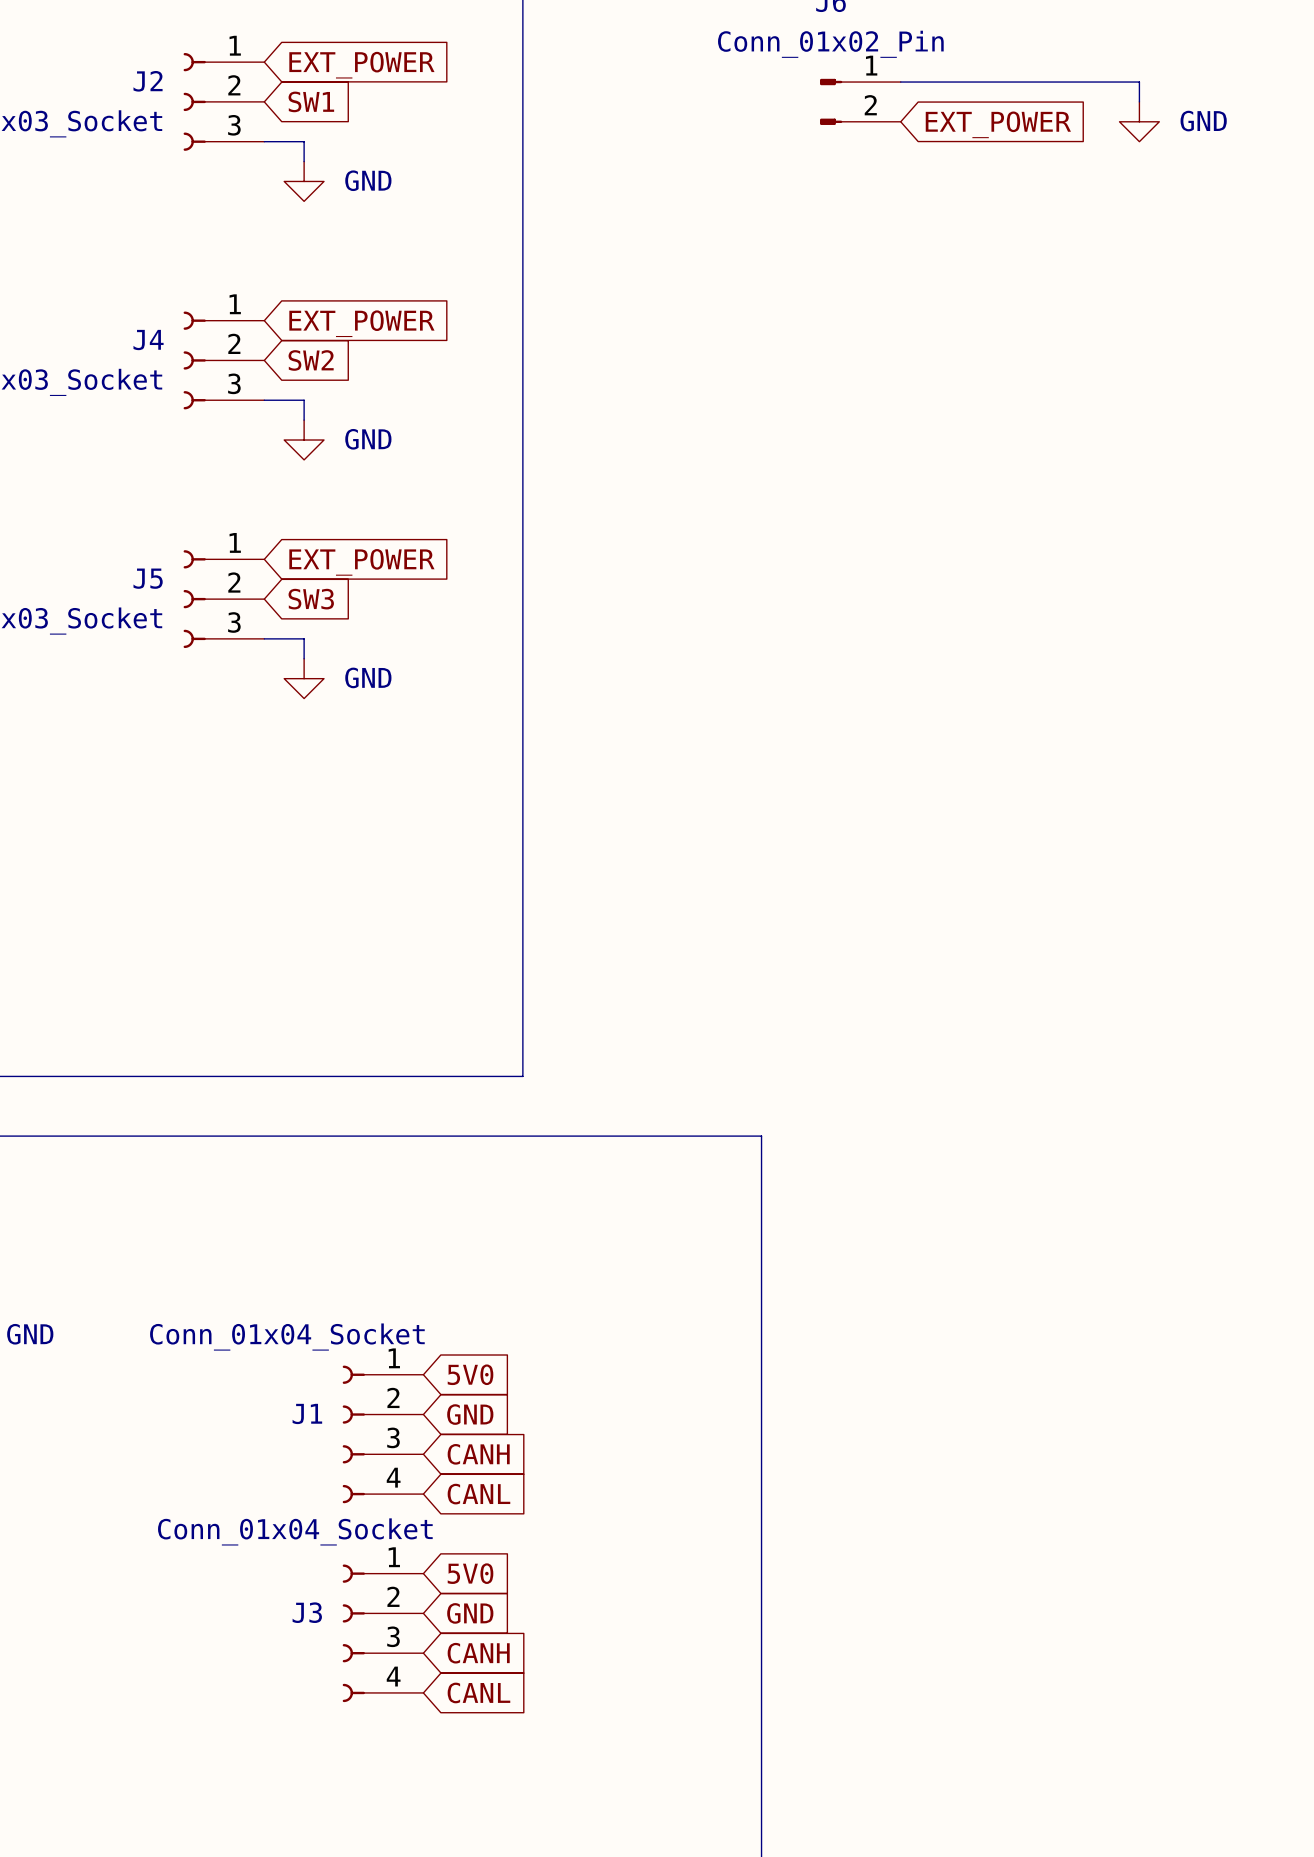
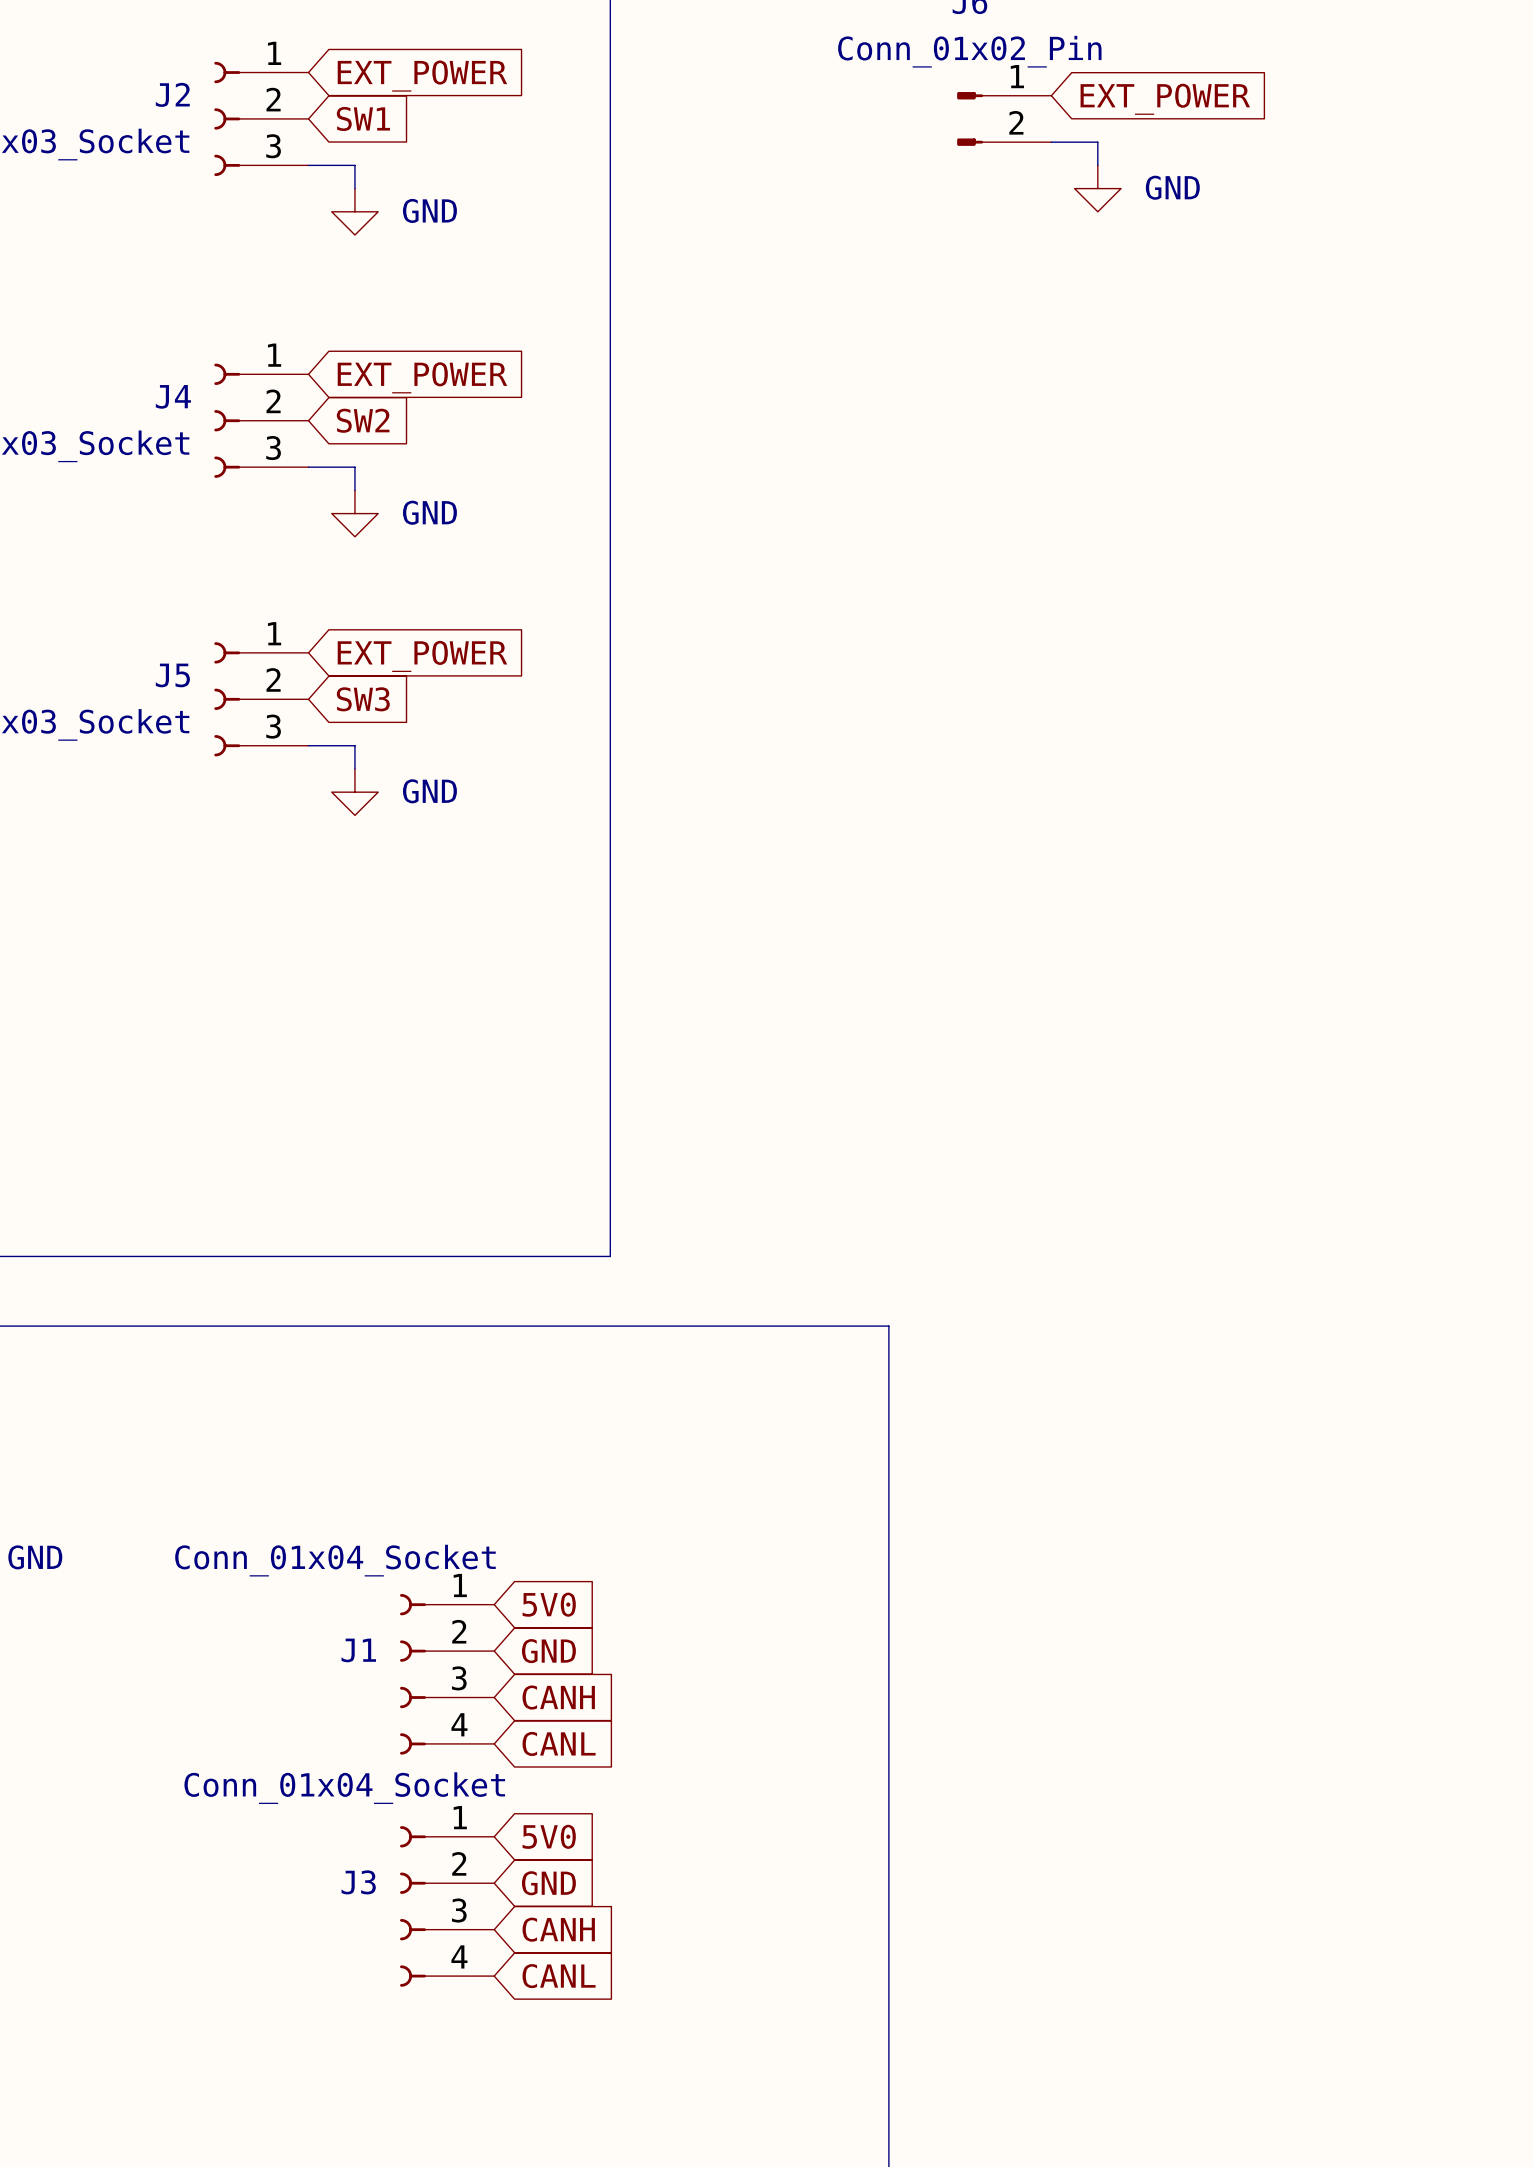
wire: (900, 82) (1139, 82) (1139, 101) -> none
wire: none -> (1051, 142) (1097, 142) (1097, 165)
power symbol position: GND (1139, 121) -> GND (1097, 188)
global label position: EXT_POWER (998, 124) -> EXT_POWER (1165, 99)

